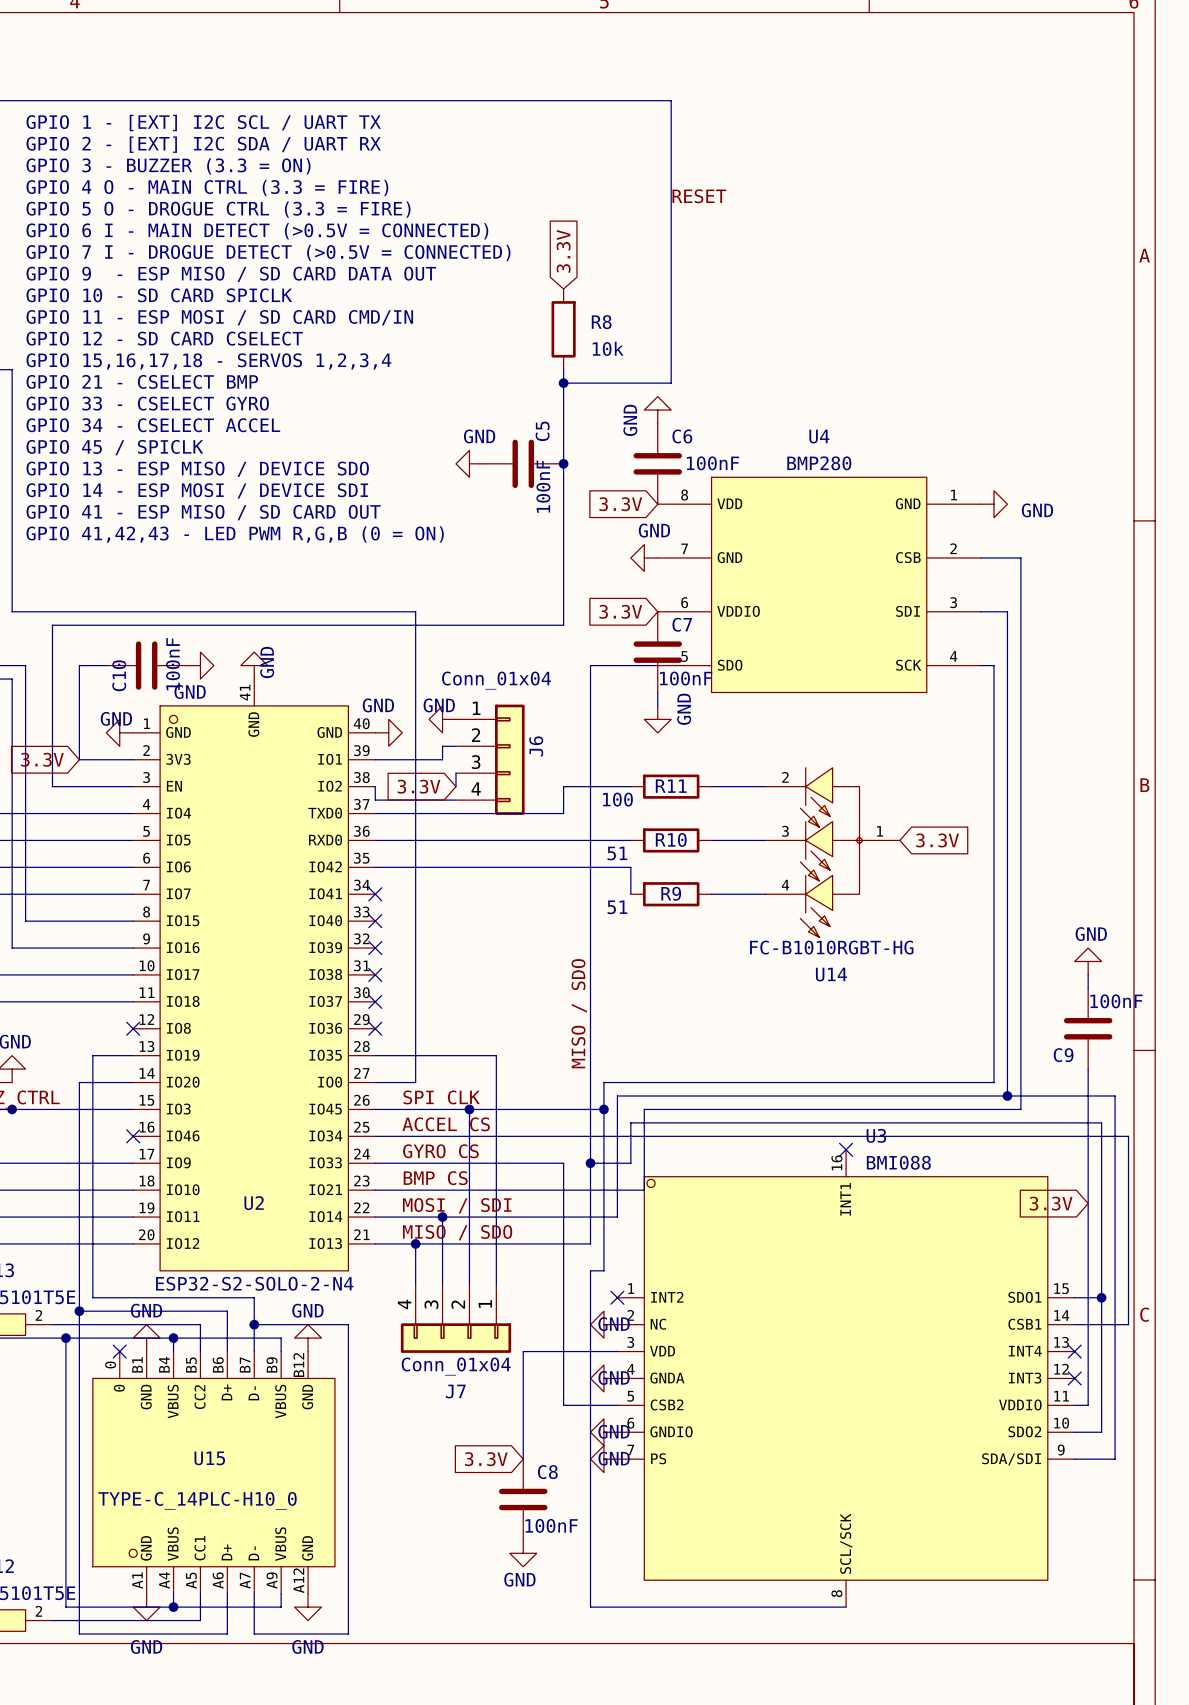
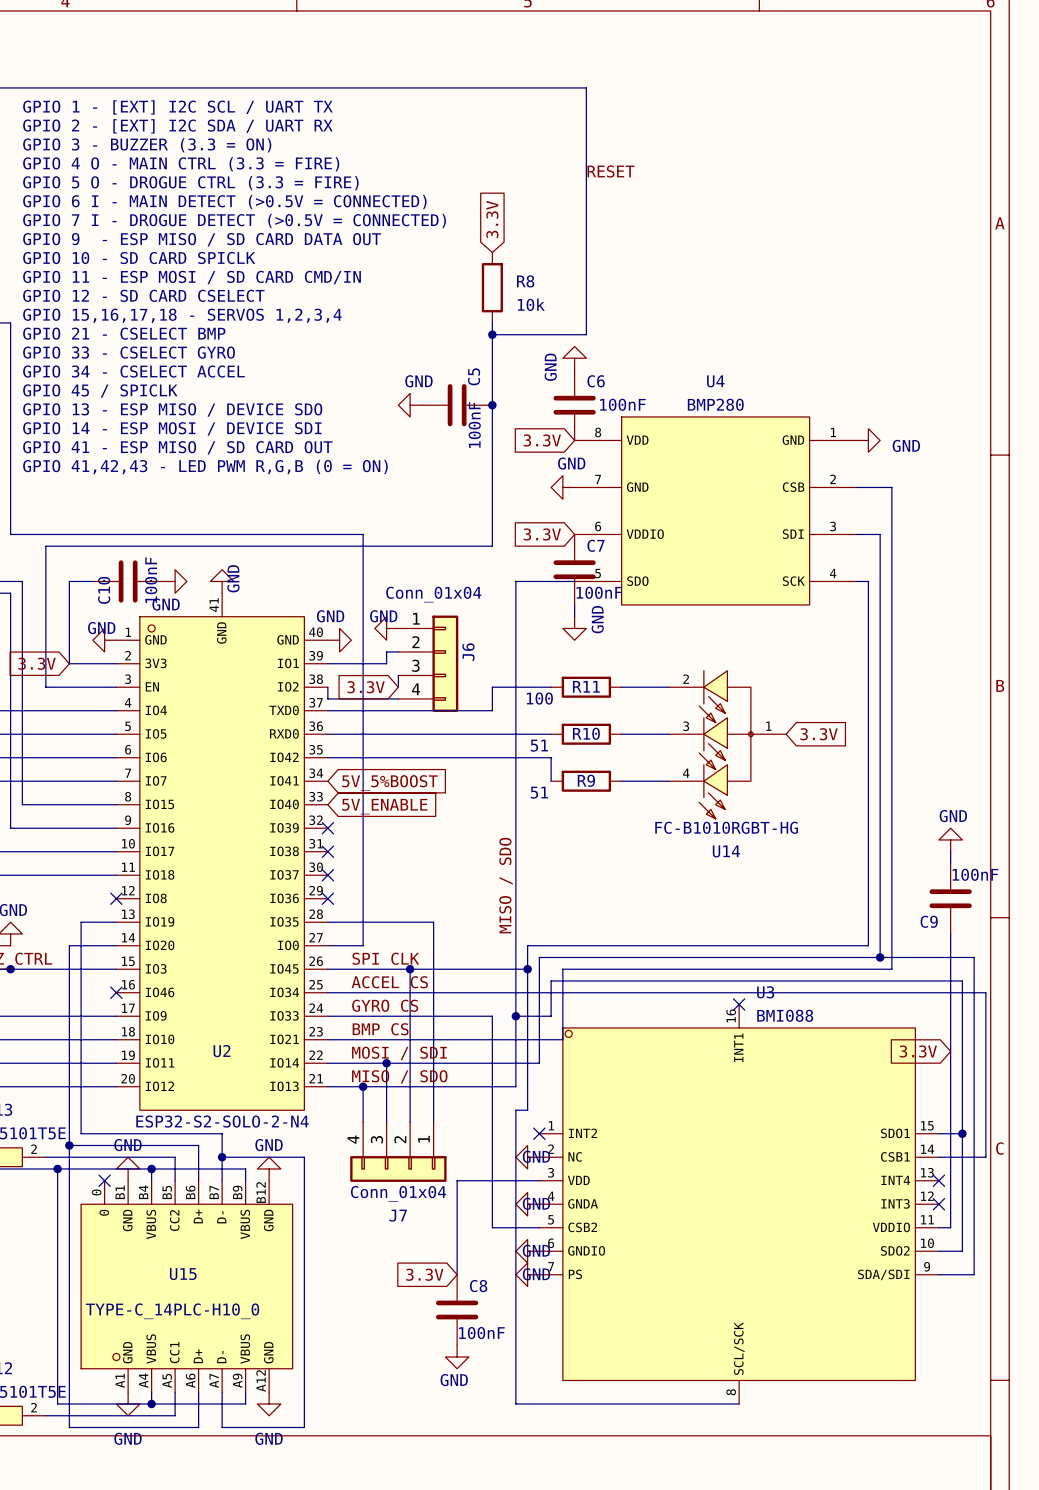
no-connect mark: (375, 894) -> none
global label: none -> 5V_5%BOOST (389, 783)
no-connect mark: (375, 921) -> none
global label: none -> 5V_ENABLE (384, 806)

